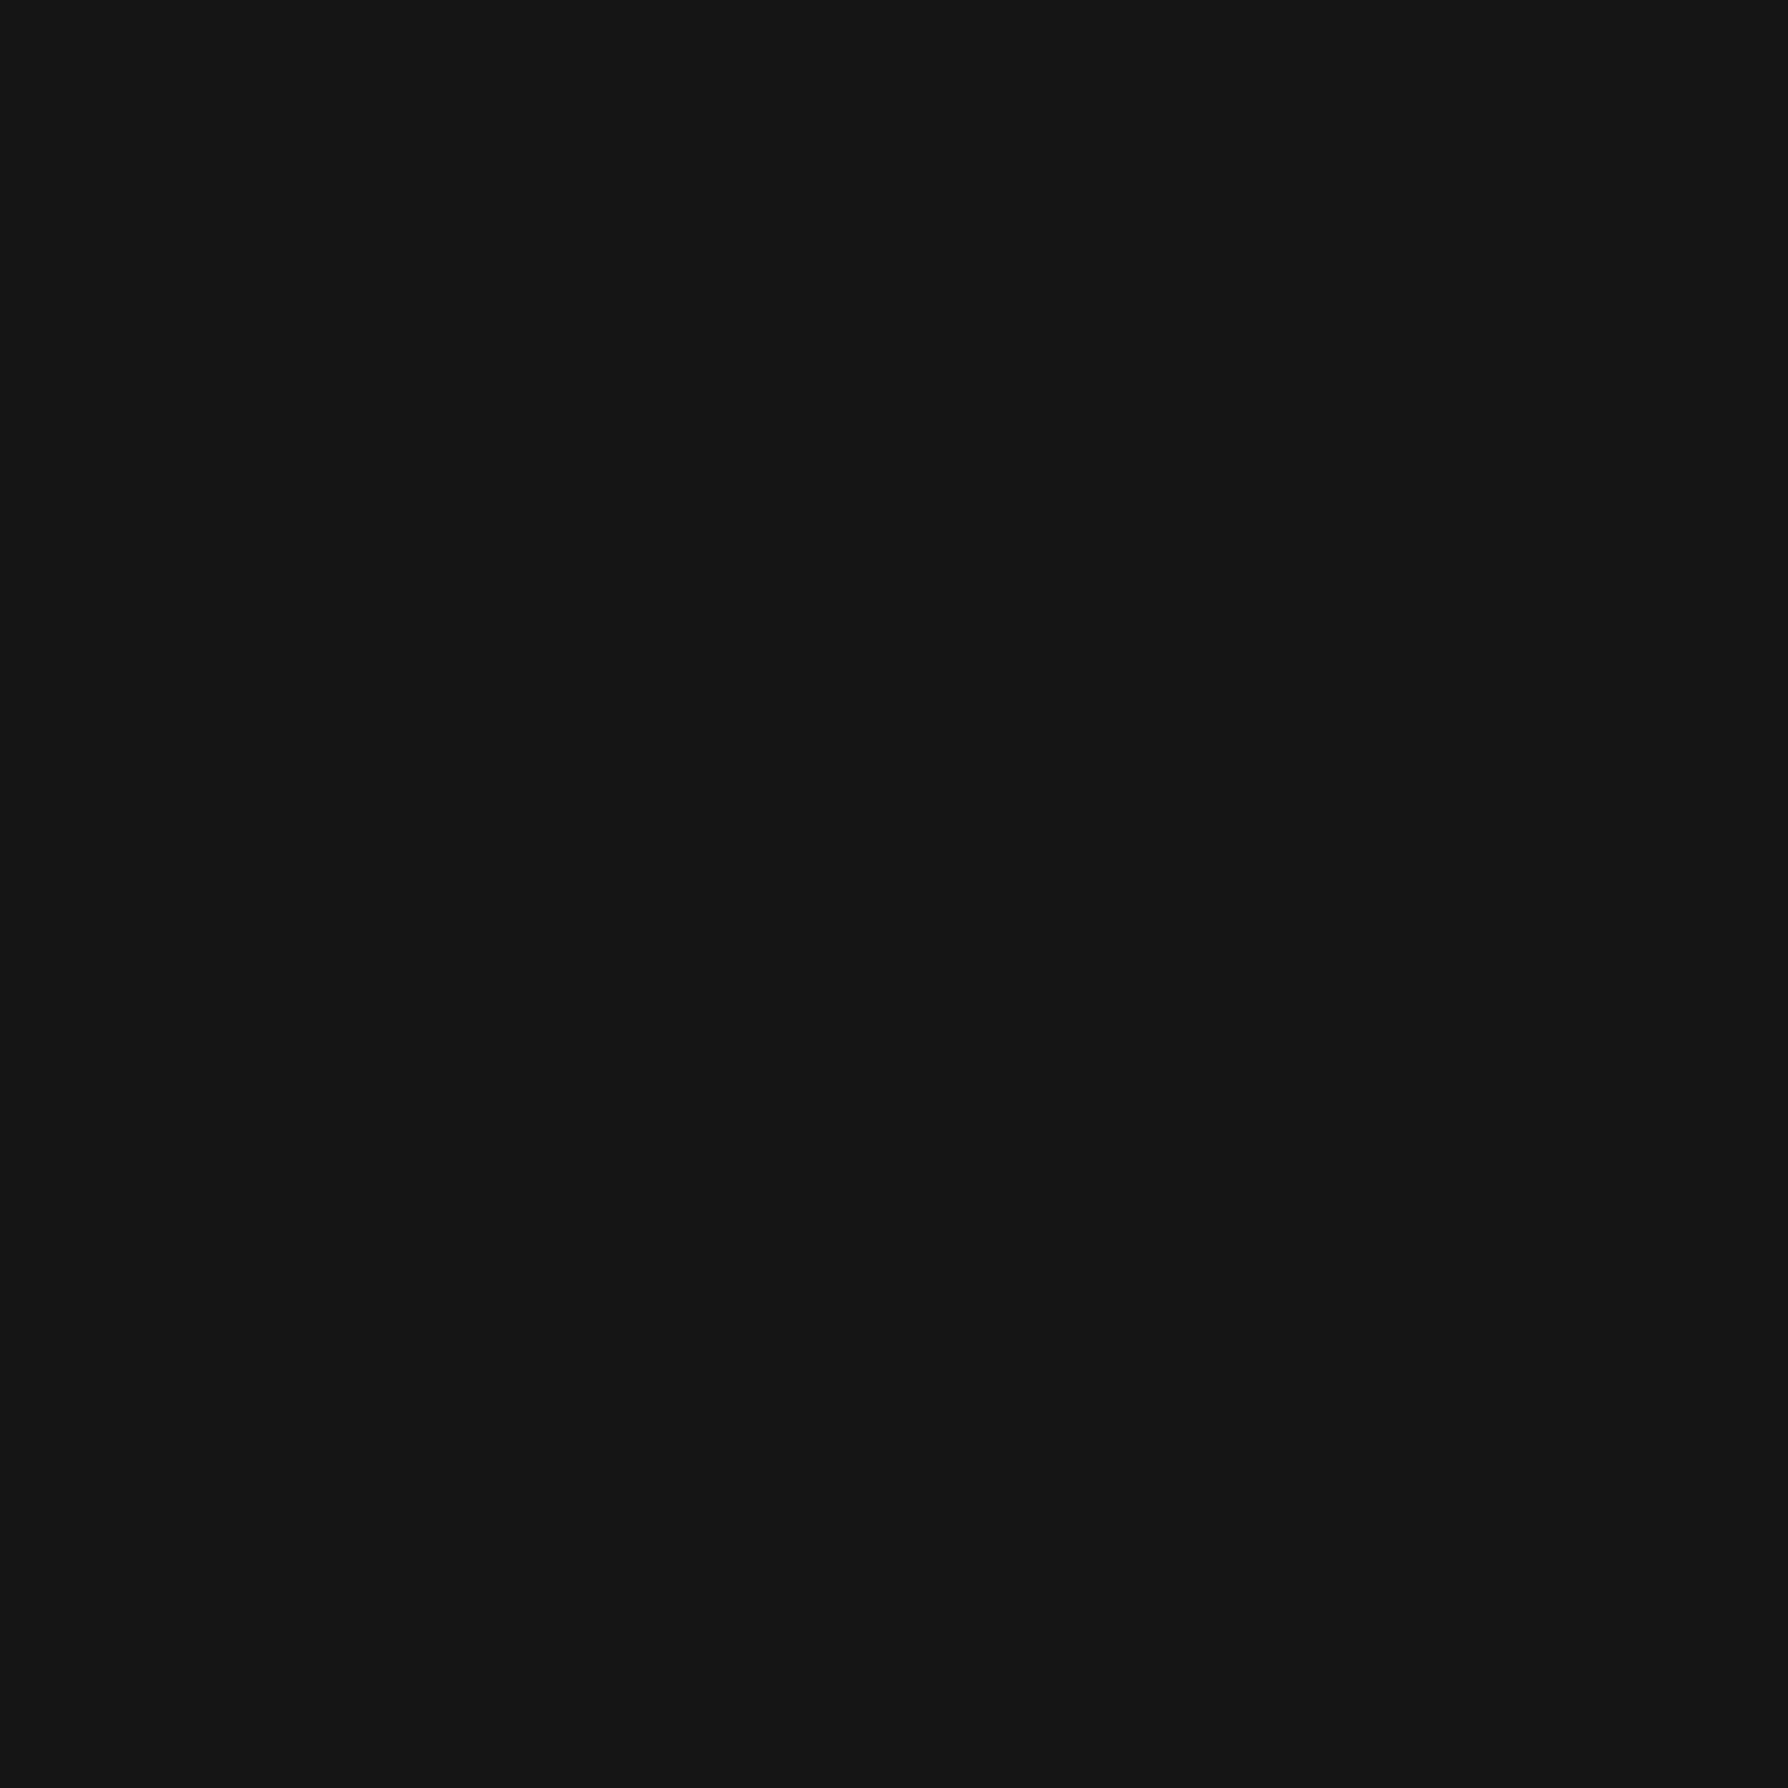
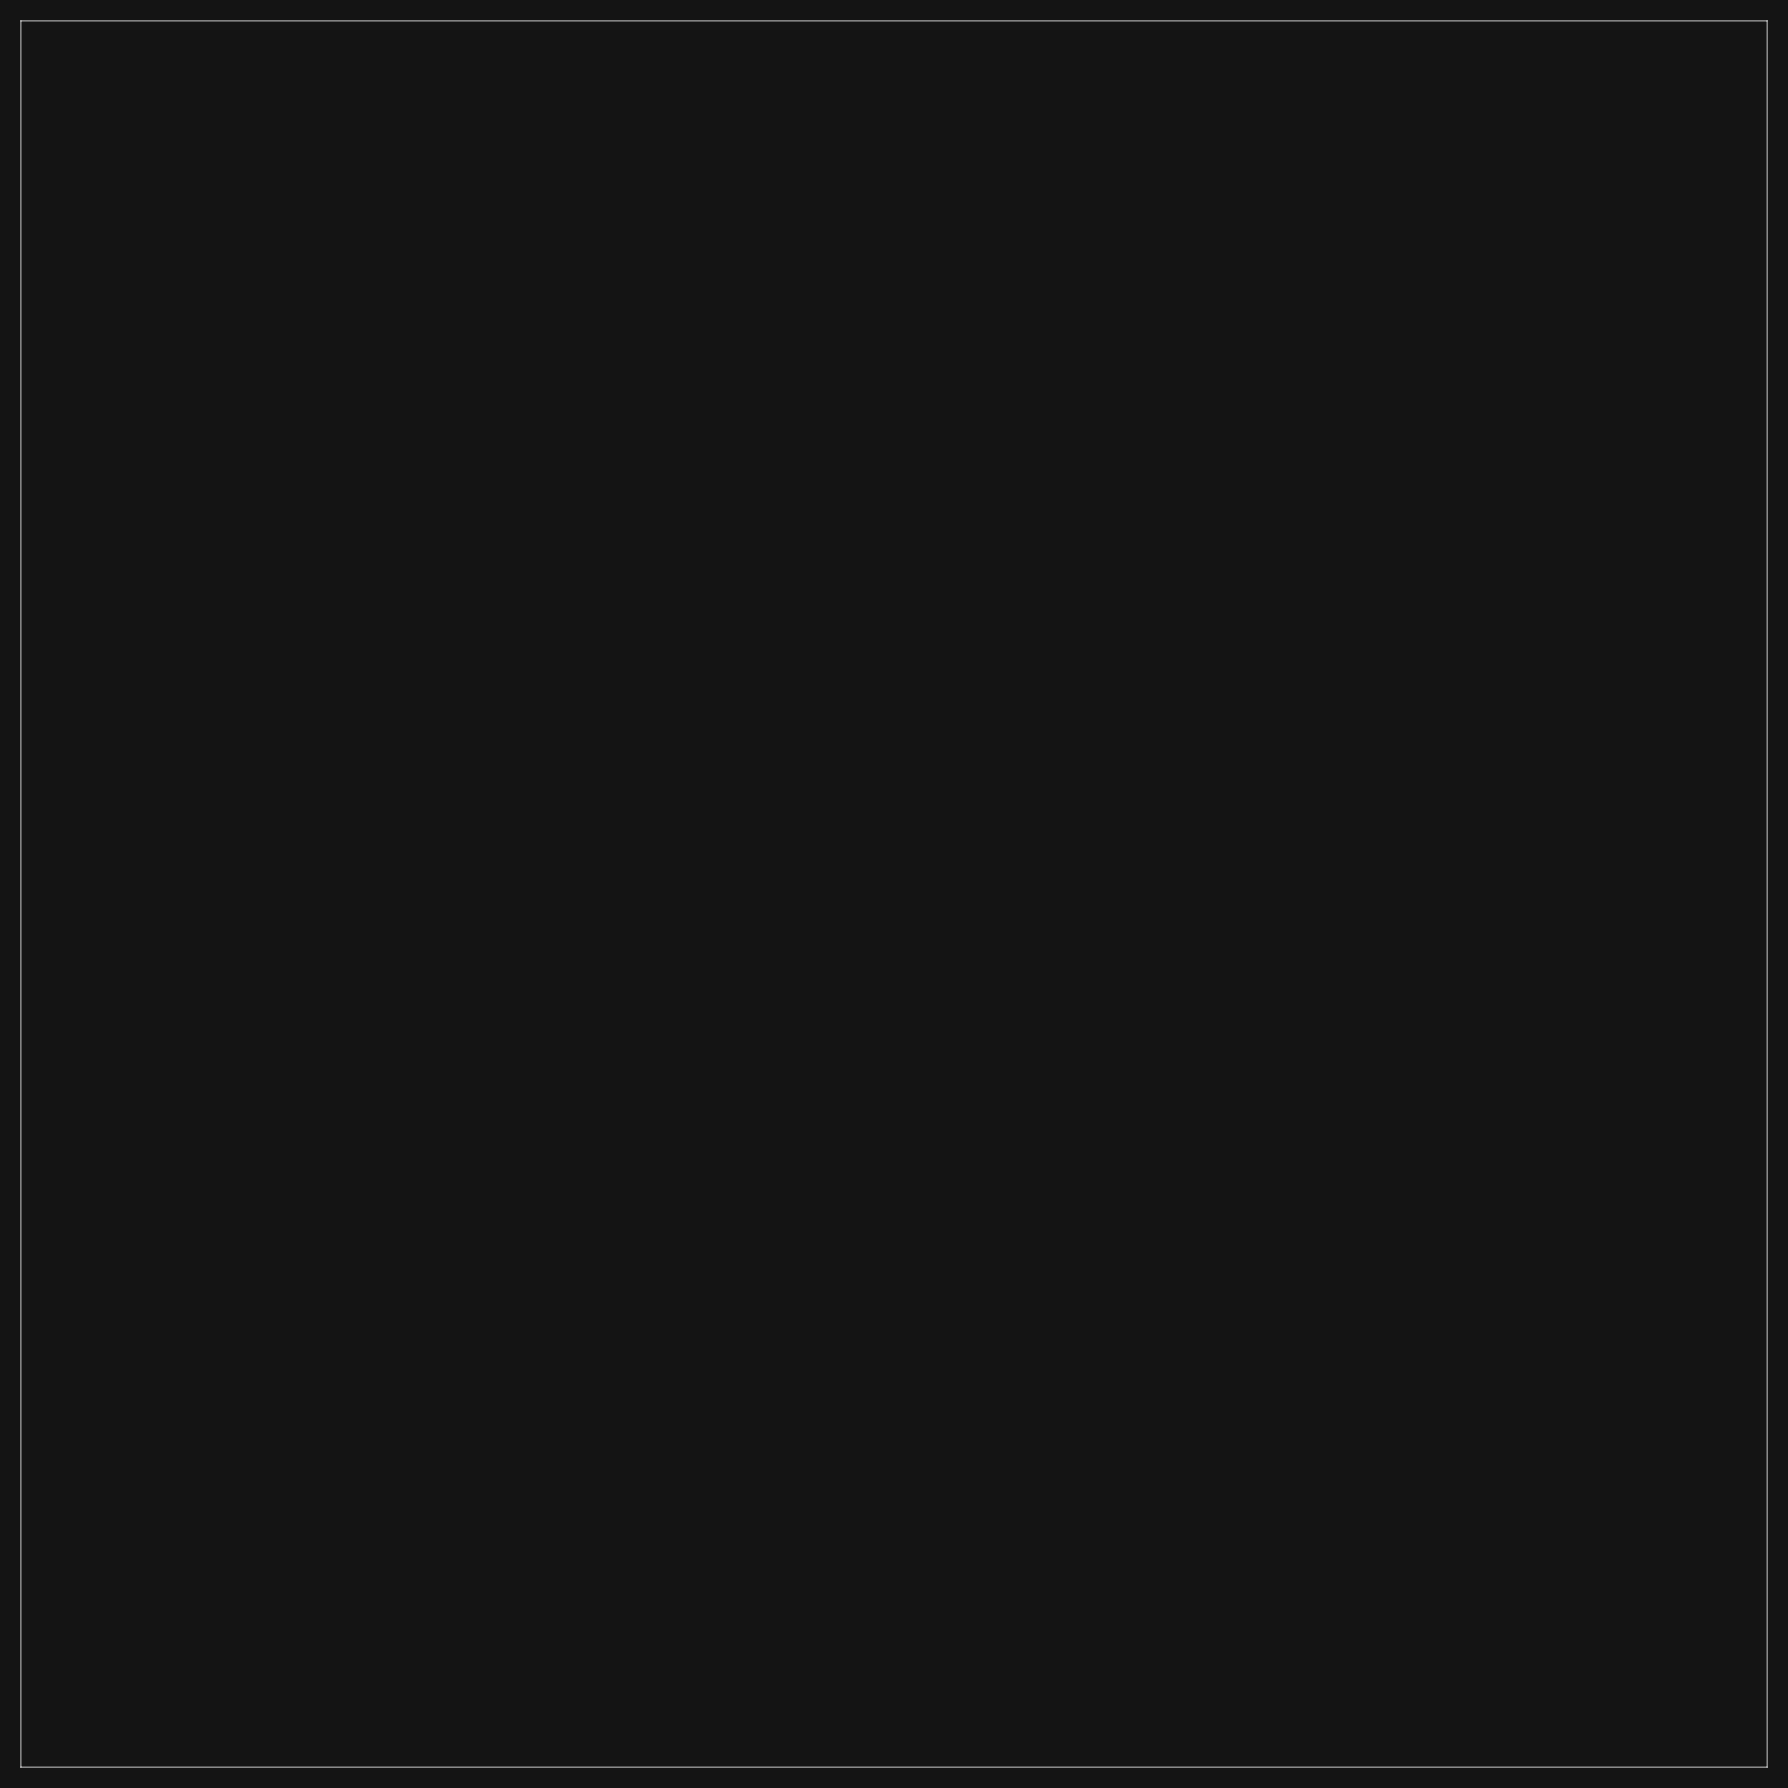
board edge: none -> (1767, 20) (20, 20) (20, 1767) (1767, 1767) (1767, 20)

